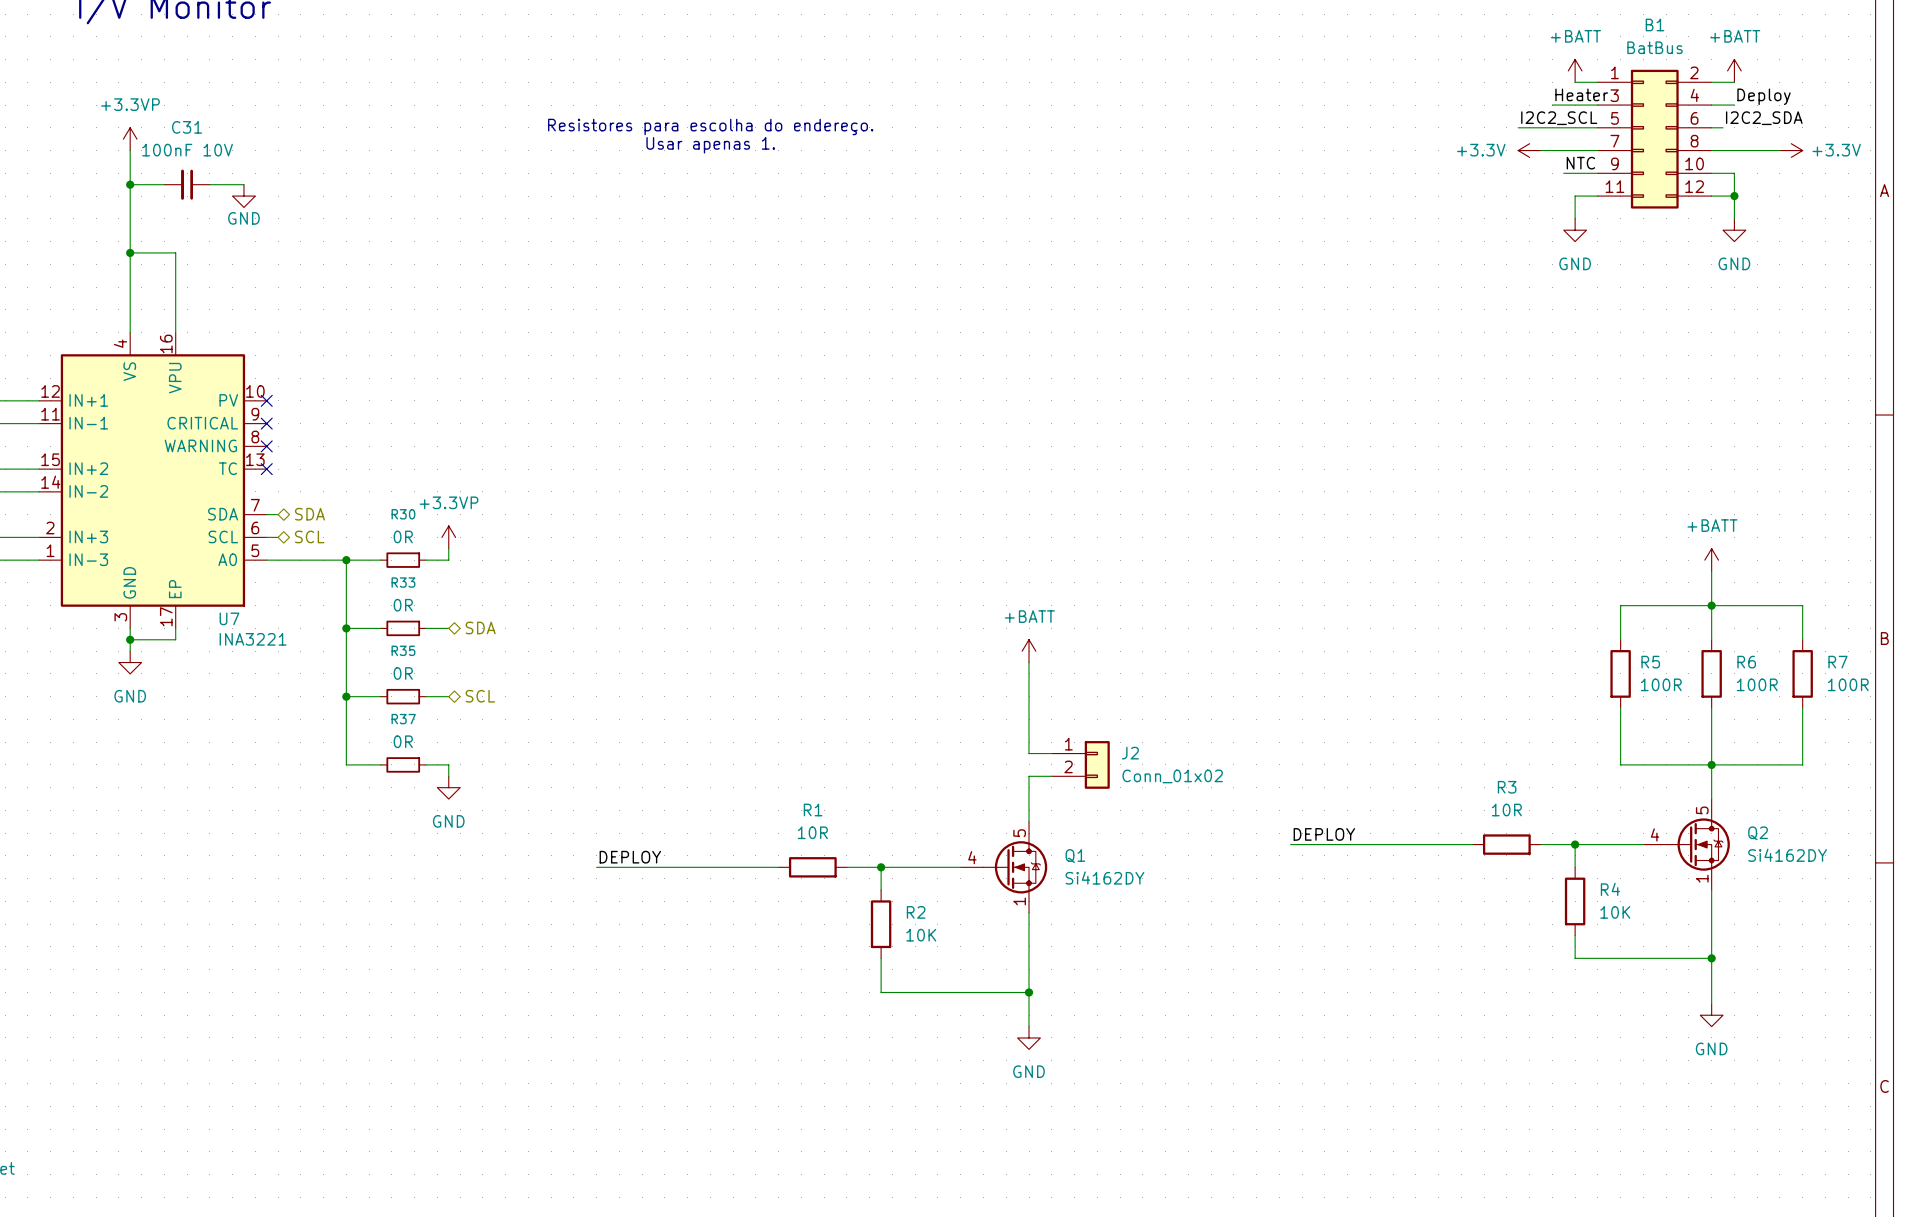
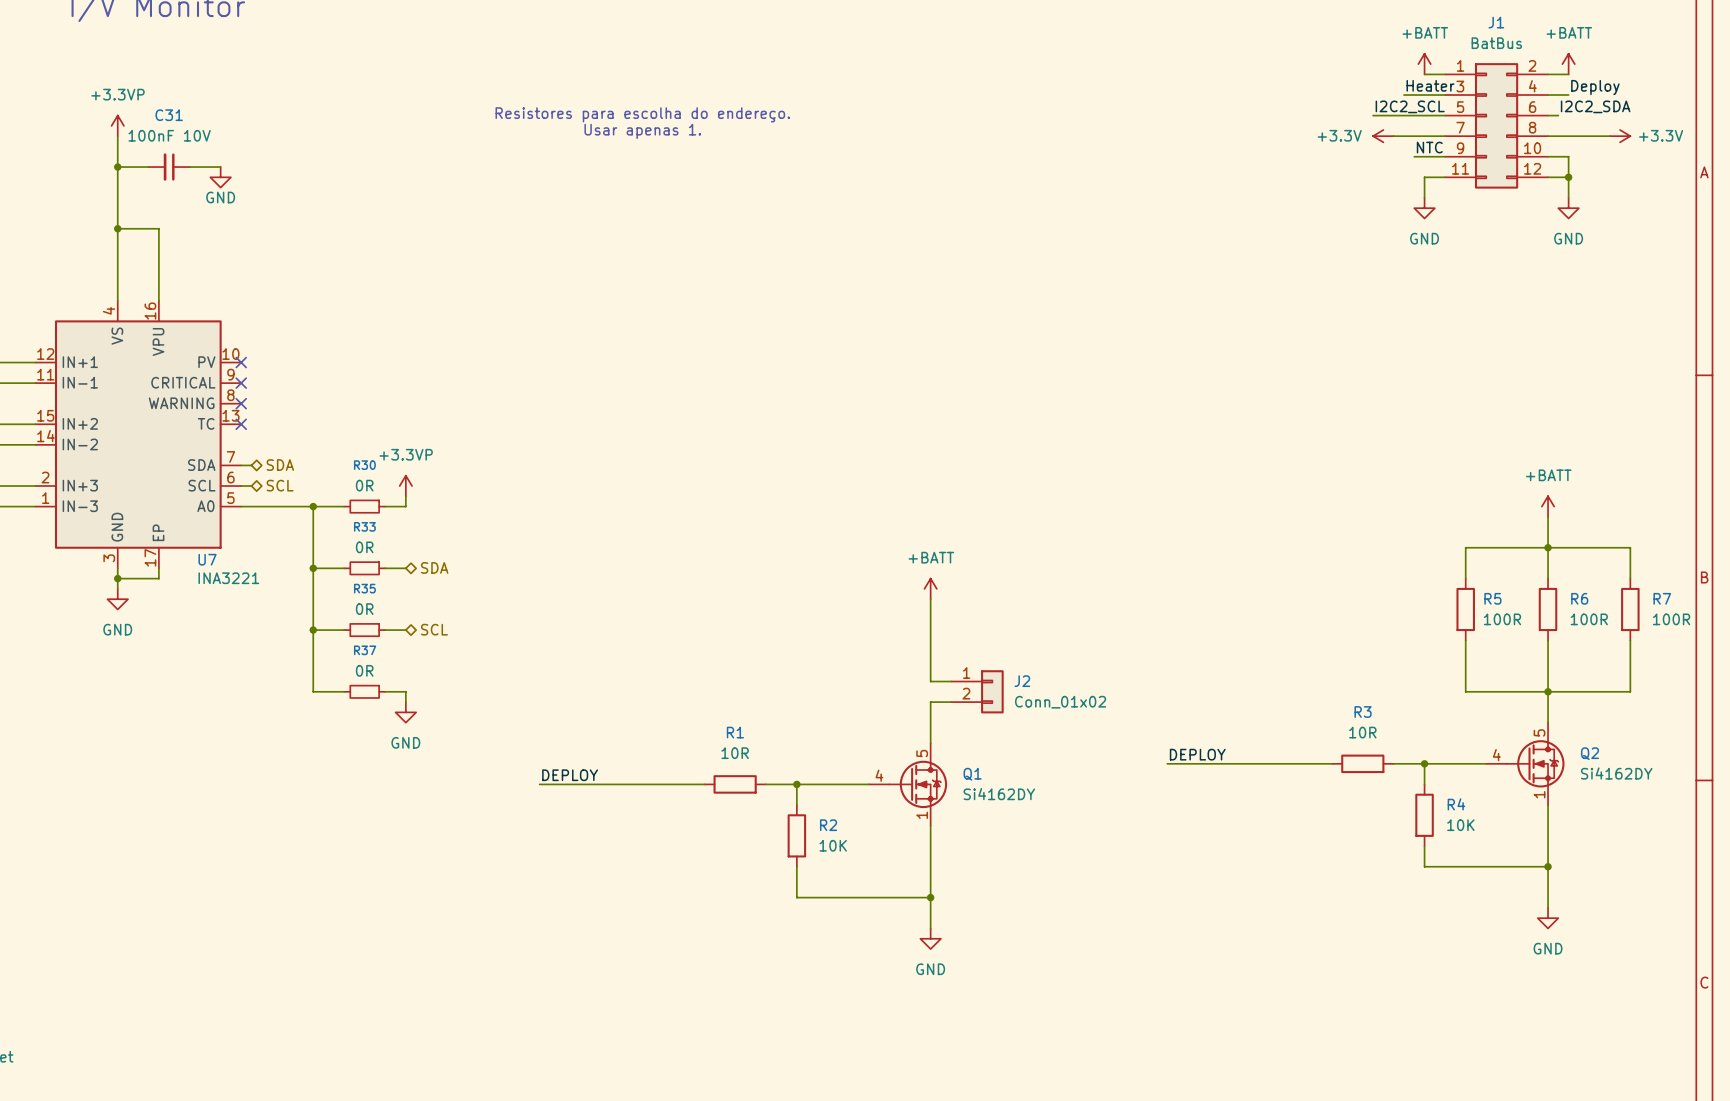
B1 name: B1 (1655, 24) -> J1 (1496, 22)

